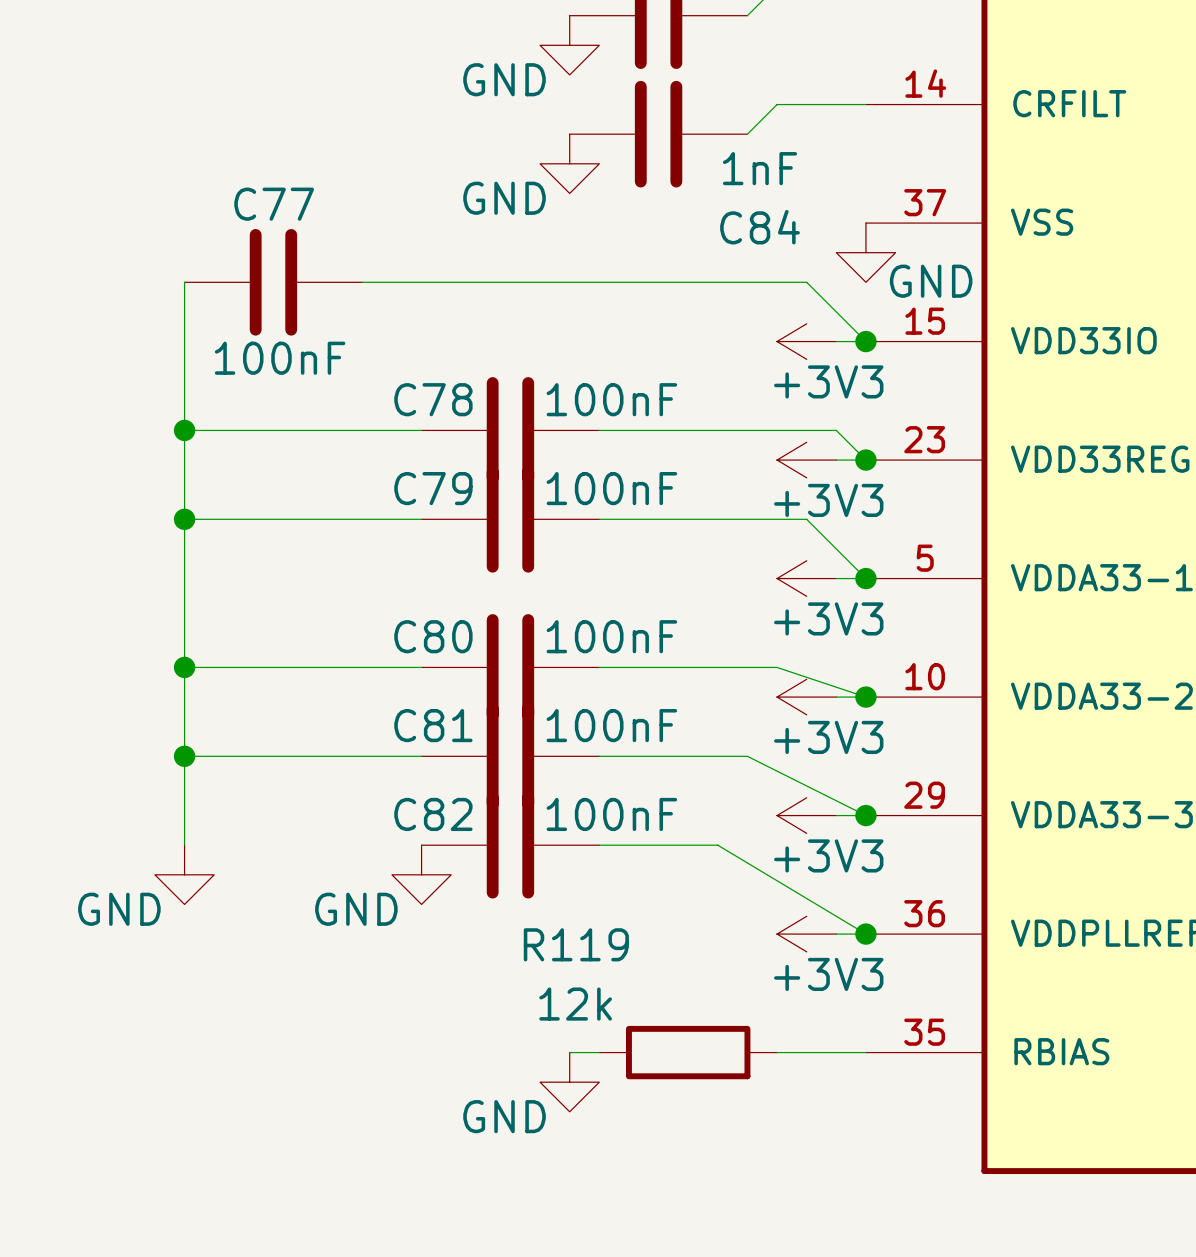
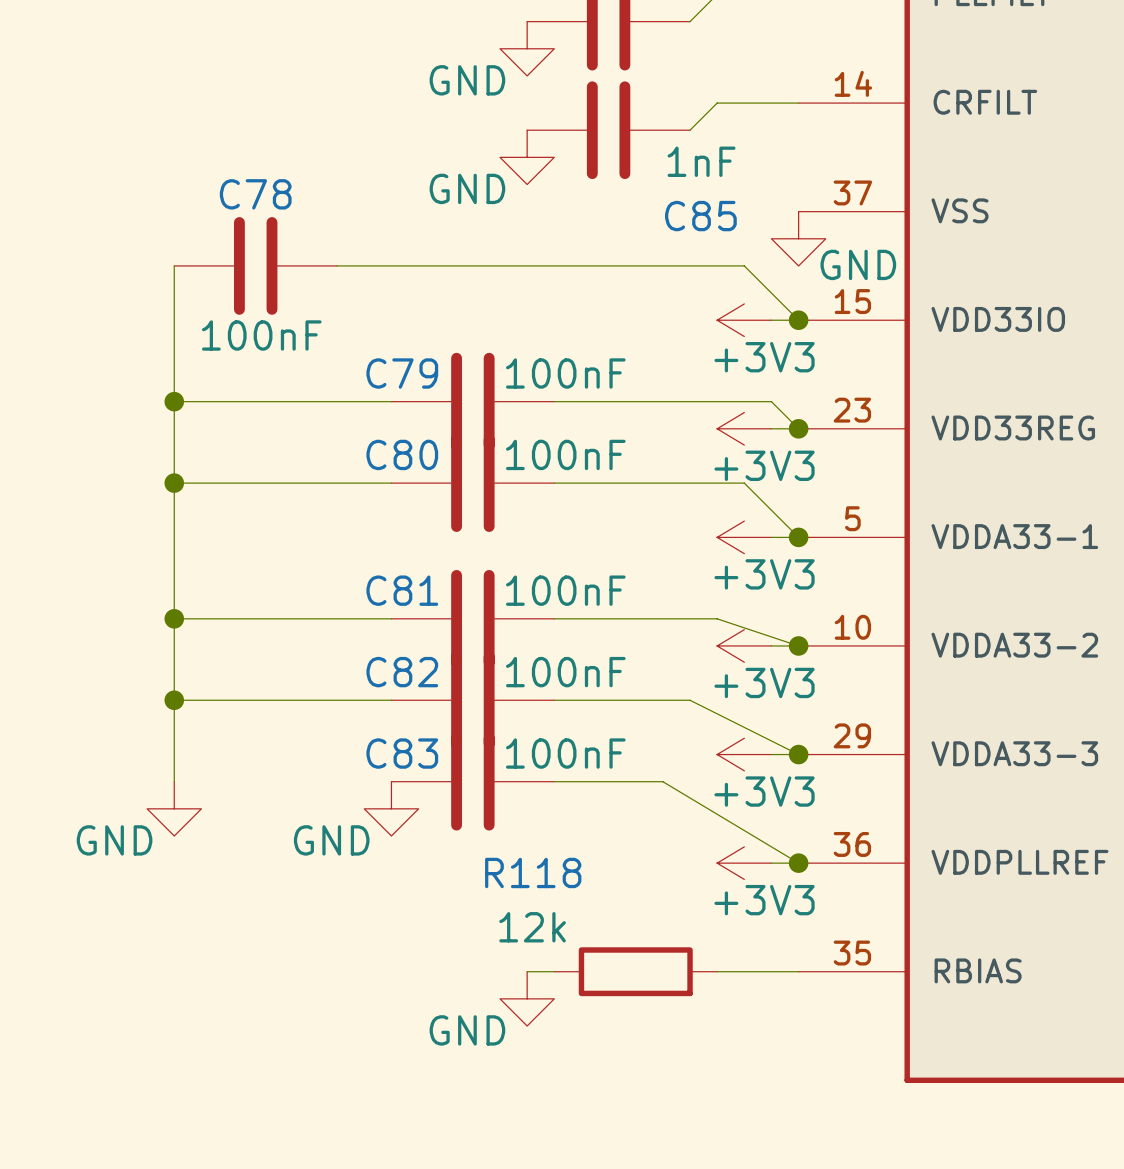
C77 name: C77 (274, 204) -> C78 (255, 194)
C84 name: C84 (760, 227) -> C85 (700, 216)
C78 name: C78 (433, 399) -> C79 (402, 373)
C79 name: C79 (433, 488) -> C80 (402, 454)
C80 name: C80 (433, 636) -> C81 (402, 590)
C81 name: C81 (433, 725) -> C82 (402, 672)
C82 name: C82 (433, 814) -> C83 (402, 753)
R119 name: R119 (576, 944) -> R118 (533, 872)

